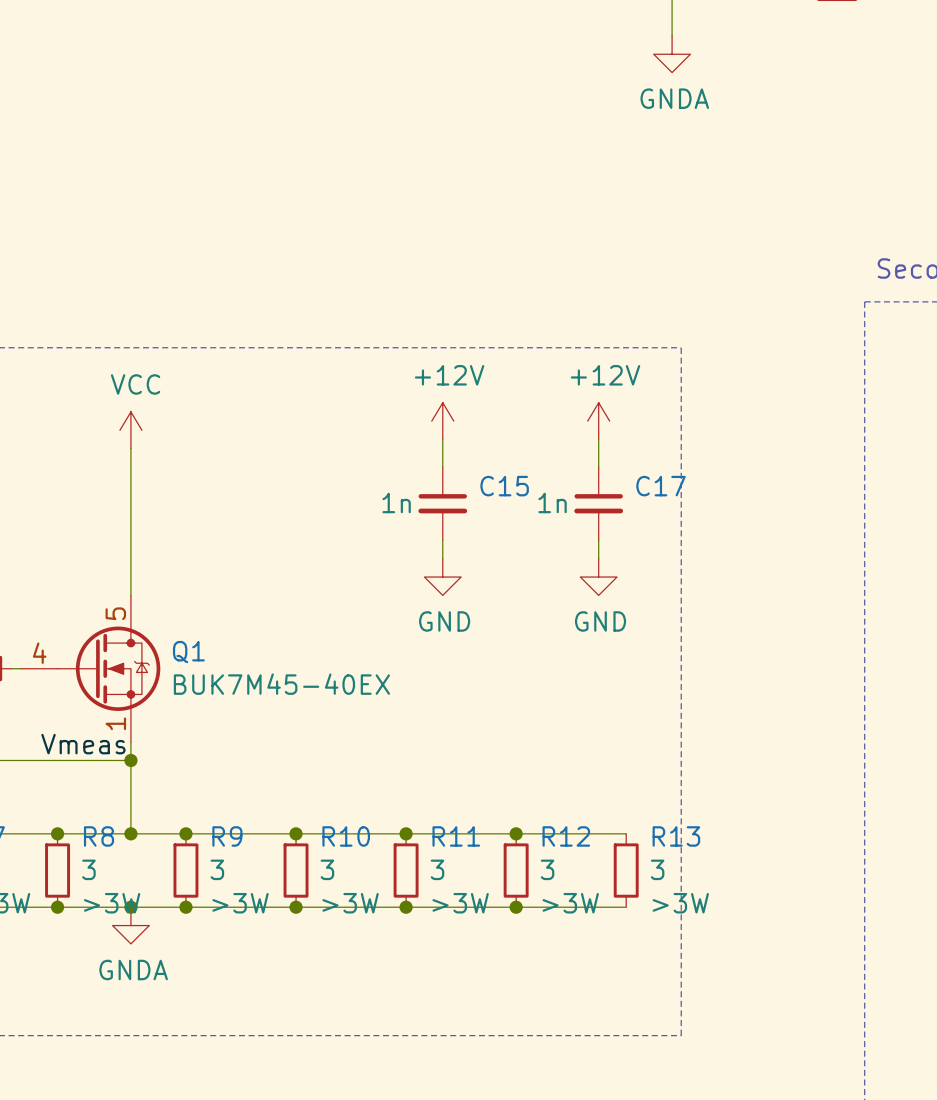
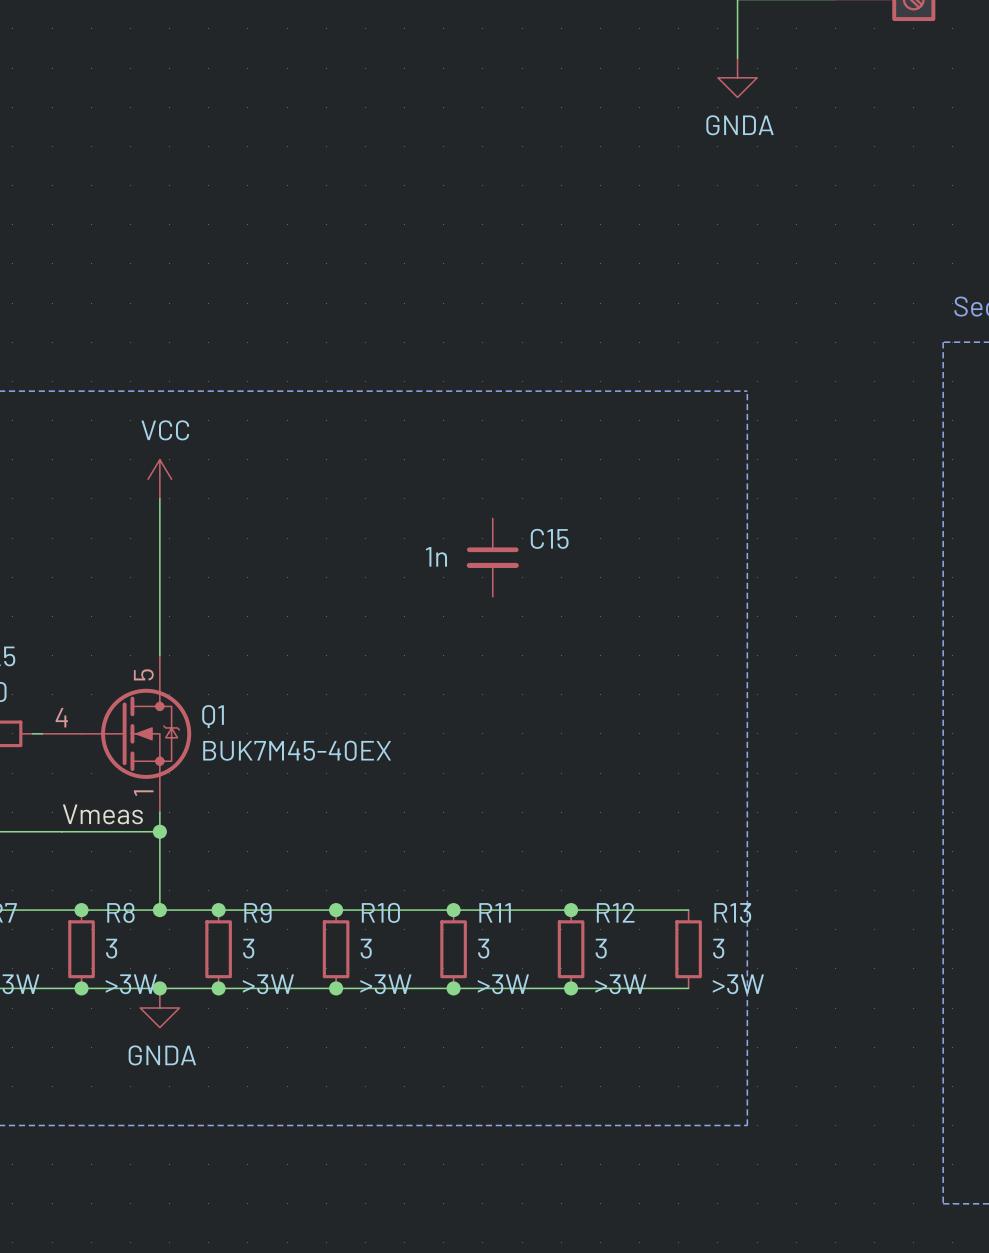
power symbol: +12V (442, 421) -> none
power symbol: +12V (598, 421) -> none
wire: (442, 439) (442, 466) -> none
wire: (598, 439) (598, 466) -> none
C17: 1n (598, 503) -> none
wire: (442, 540) (442, 558) -> none
wire: (598, 540) (598, 558) -> none
power symbol: GND (442, 577) -> none
power symbol: GND (598, 577) -> none

